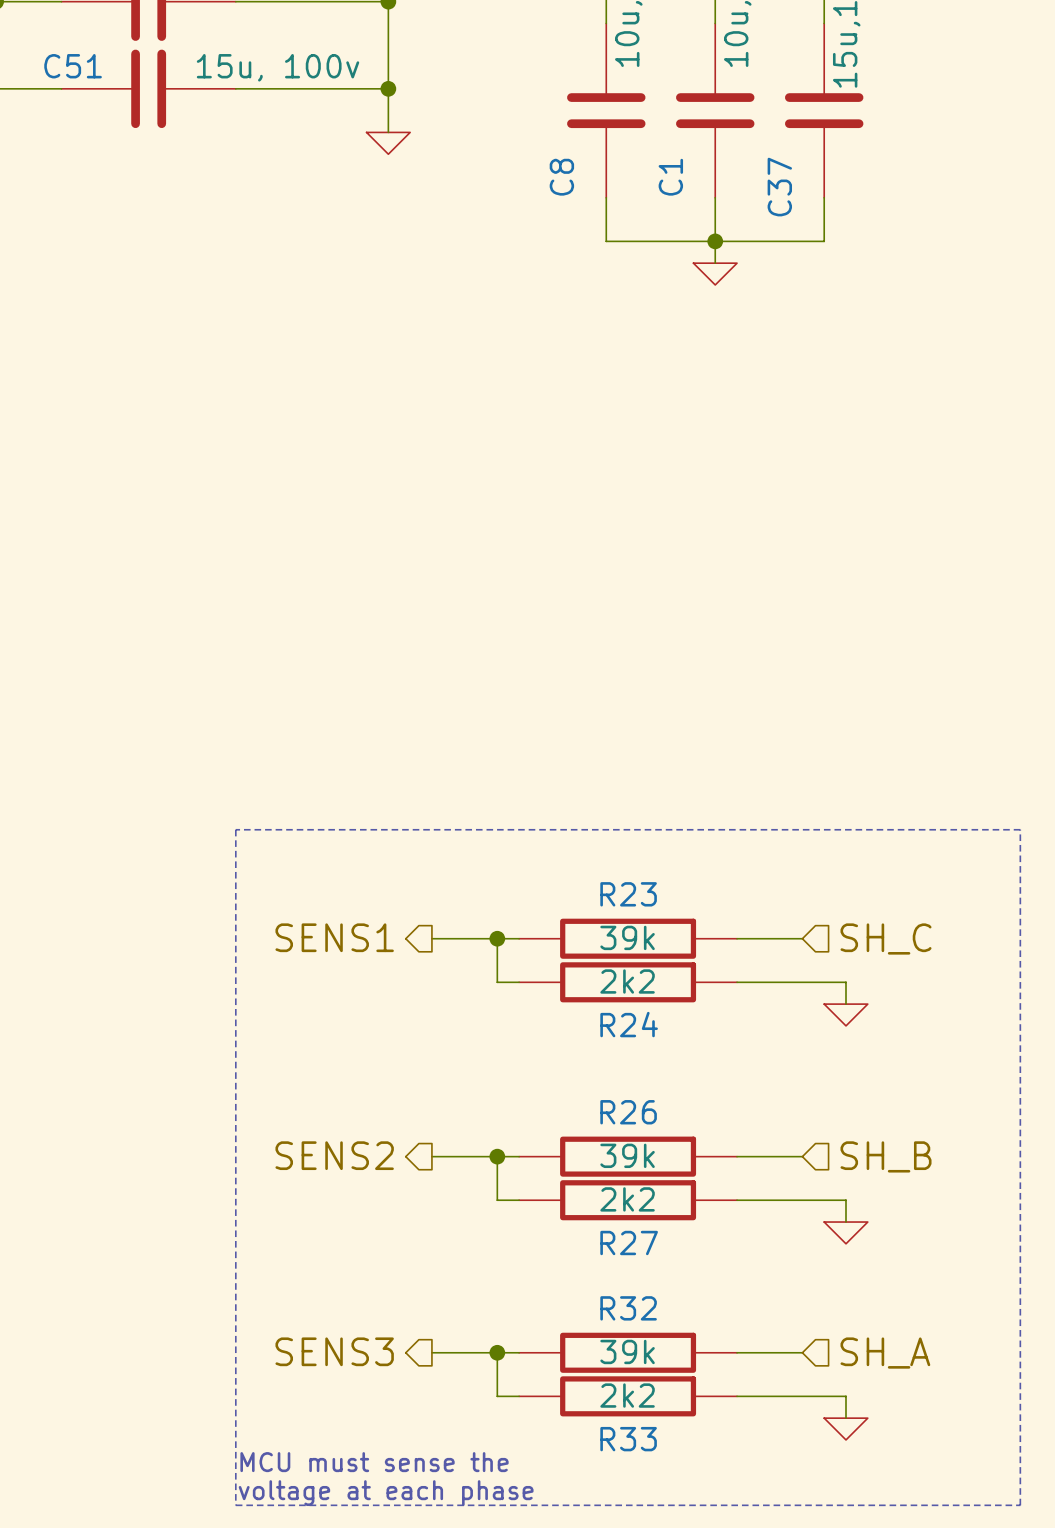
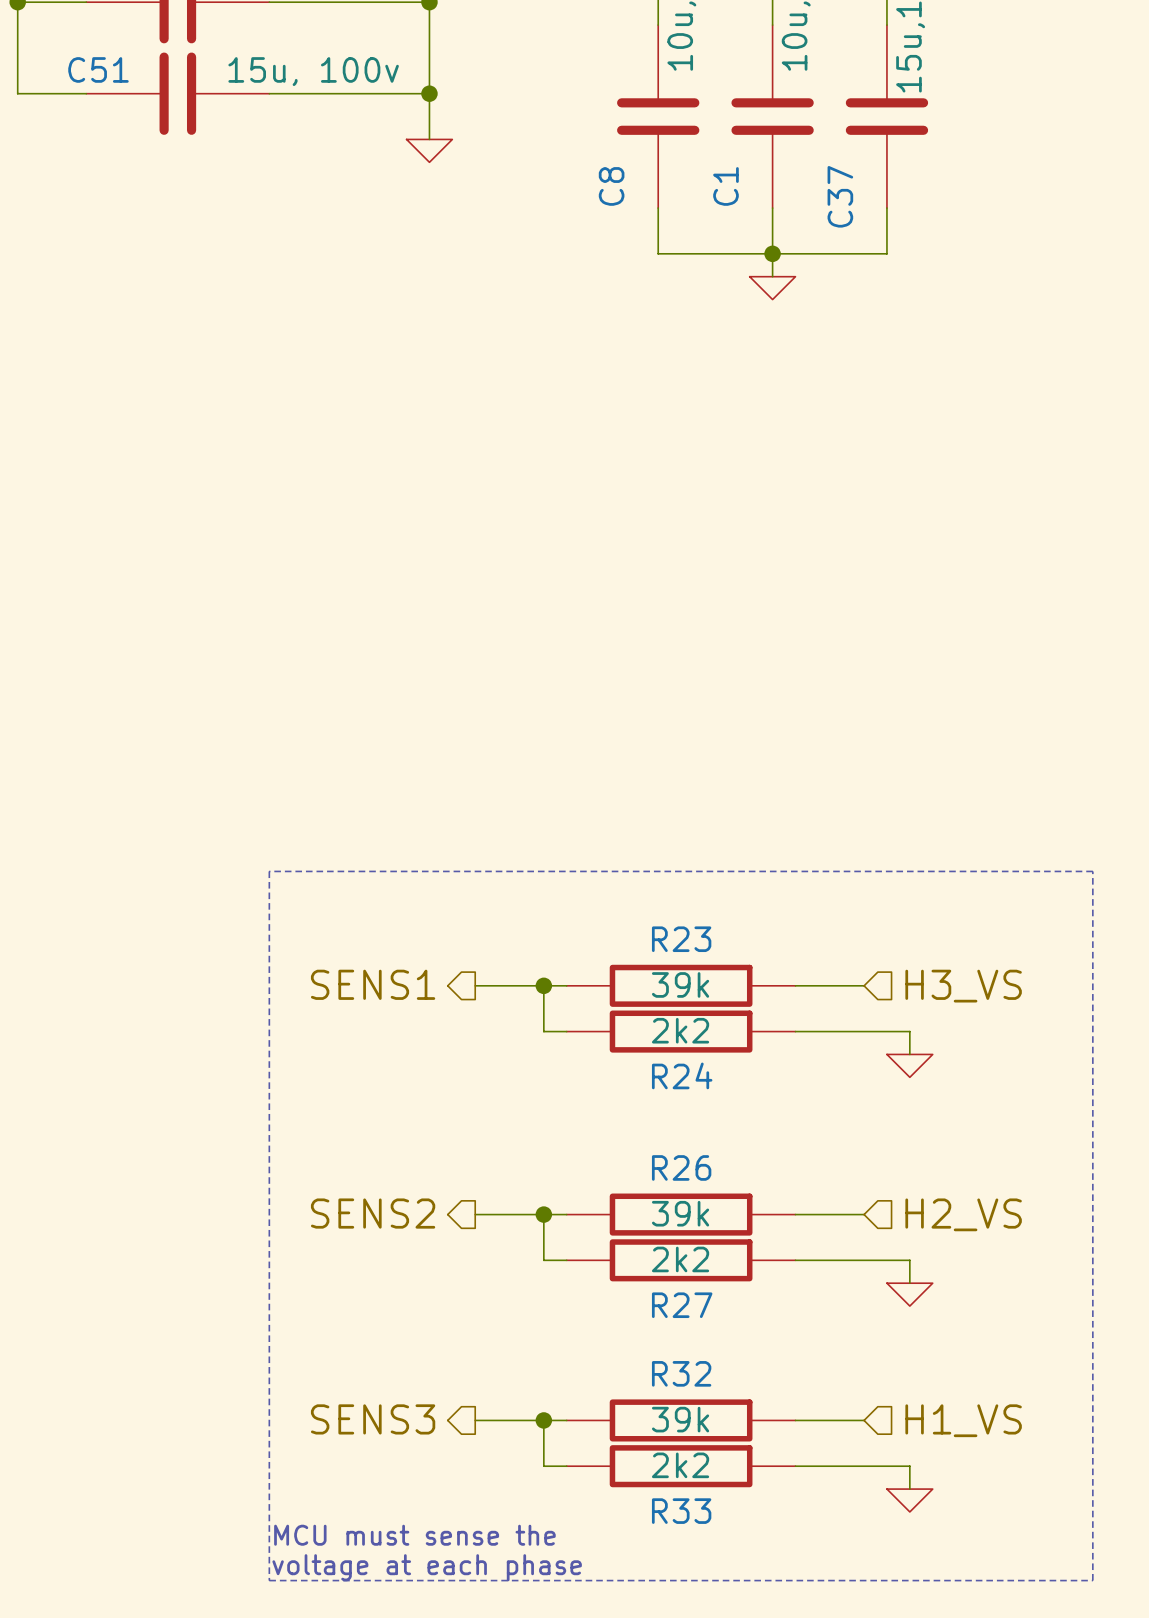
hierarchical label: SH_C (886, 938) -> H3_VS (963, 986)
hierarchical label: SH_B (886, 1156) -> H2_VS (963, 1214)
hierarchical label: SH_A (885, 1353) -> H1_VS (963, 1420)

